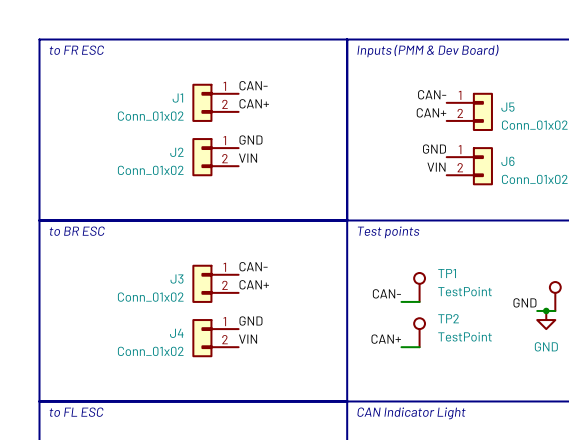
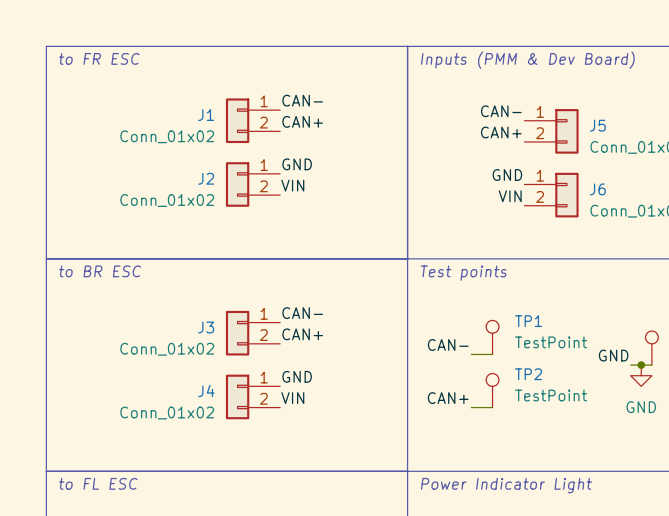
text: CAN Indicator Light (411, 413) -> Power Indicator Light (506, 485)

